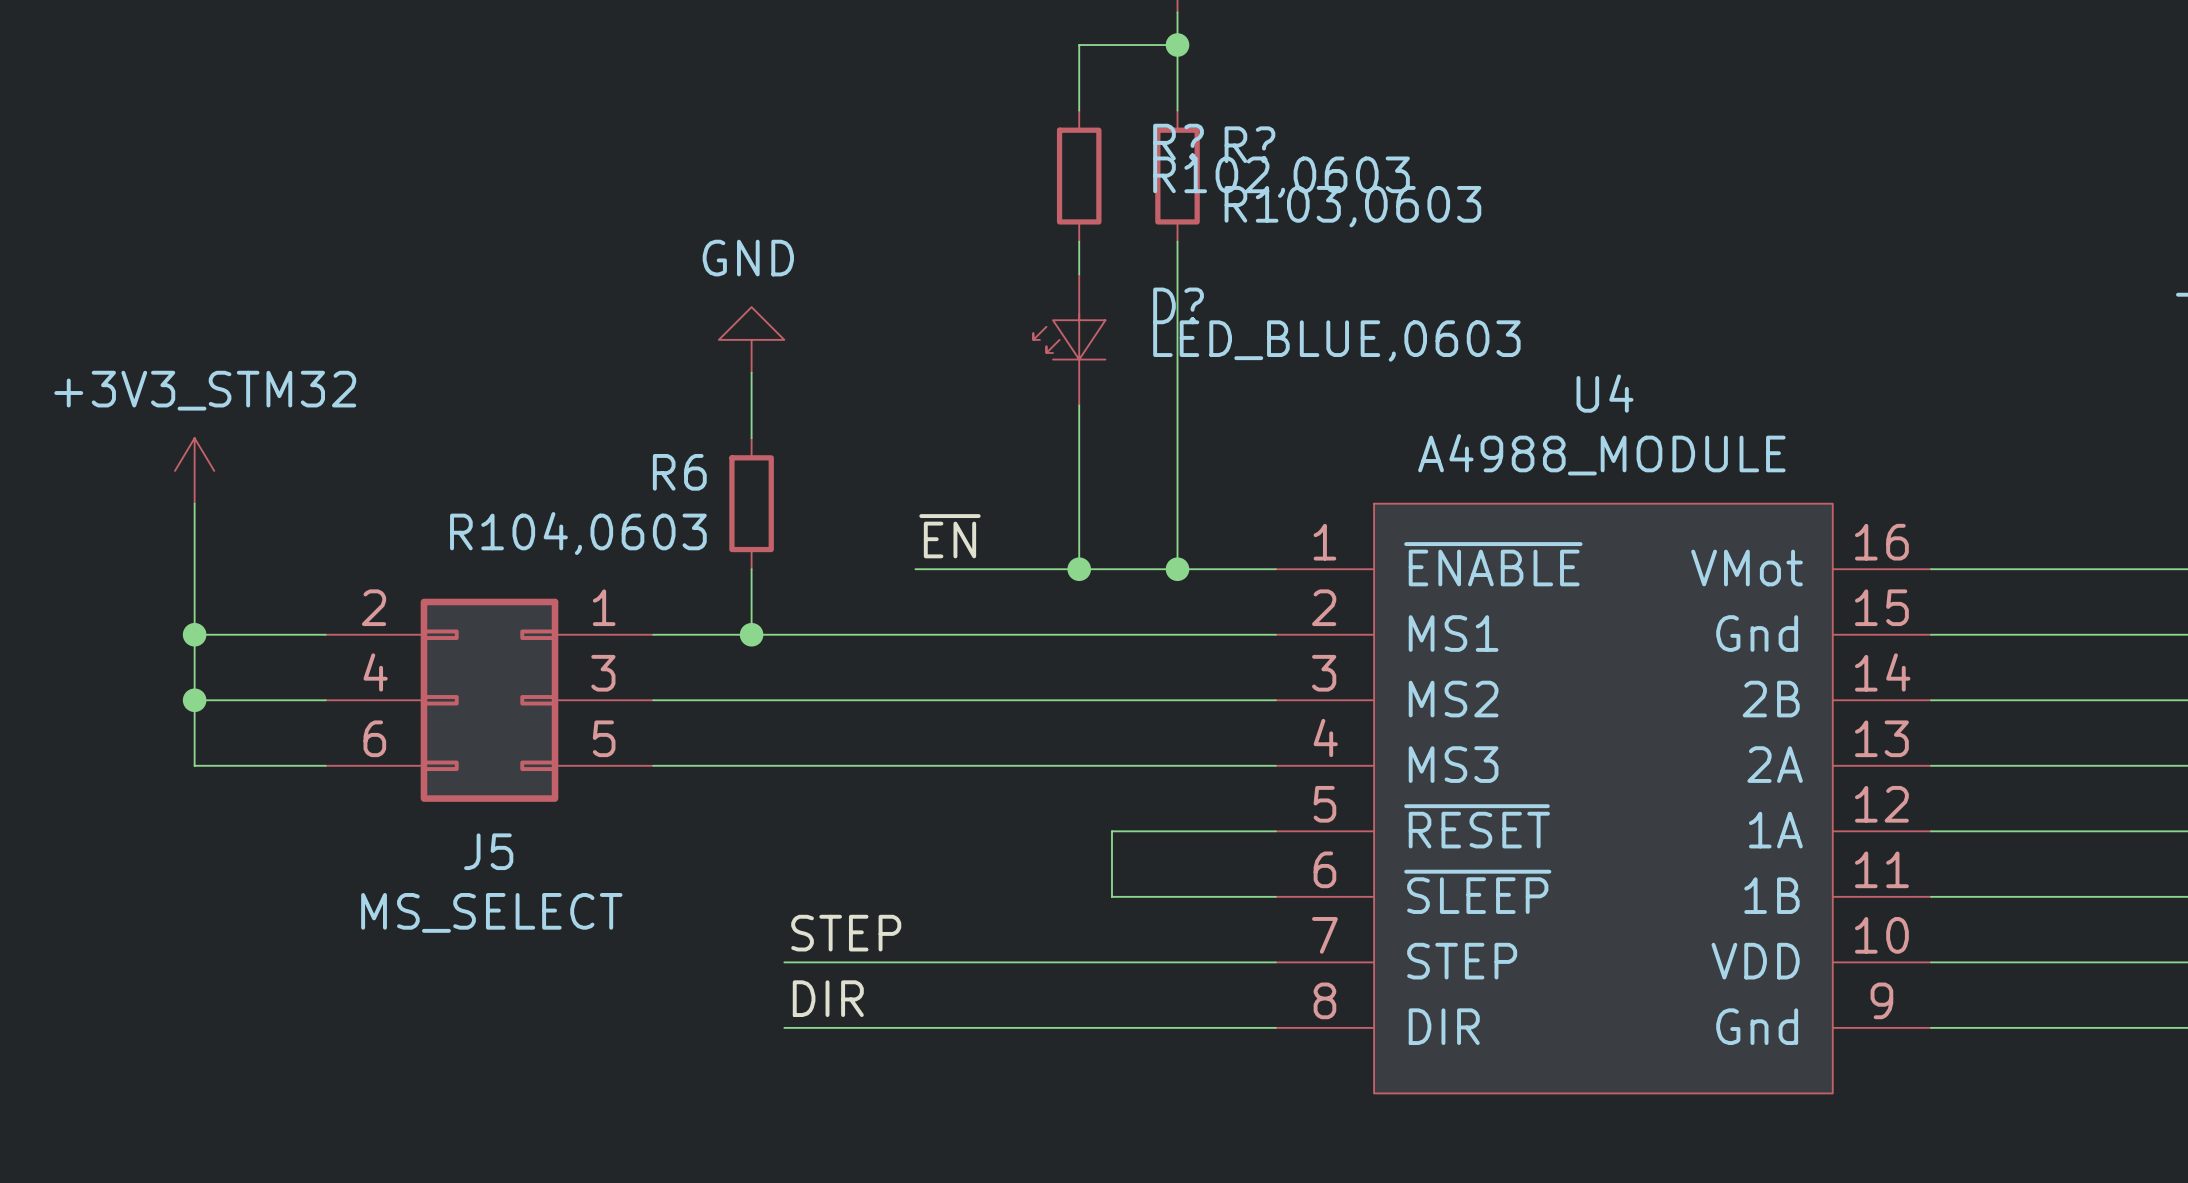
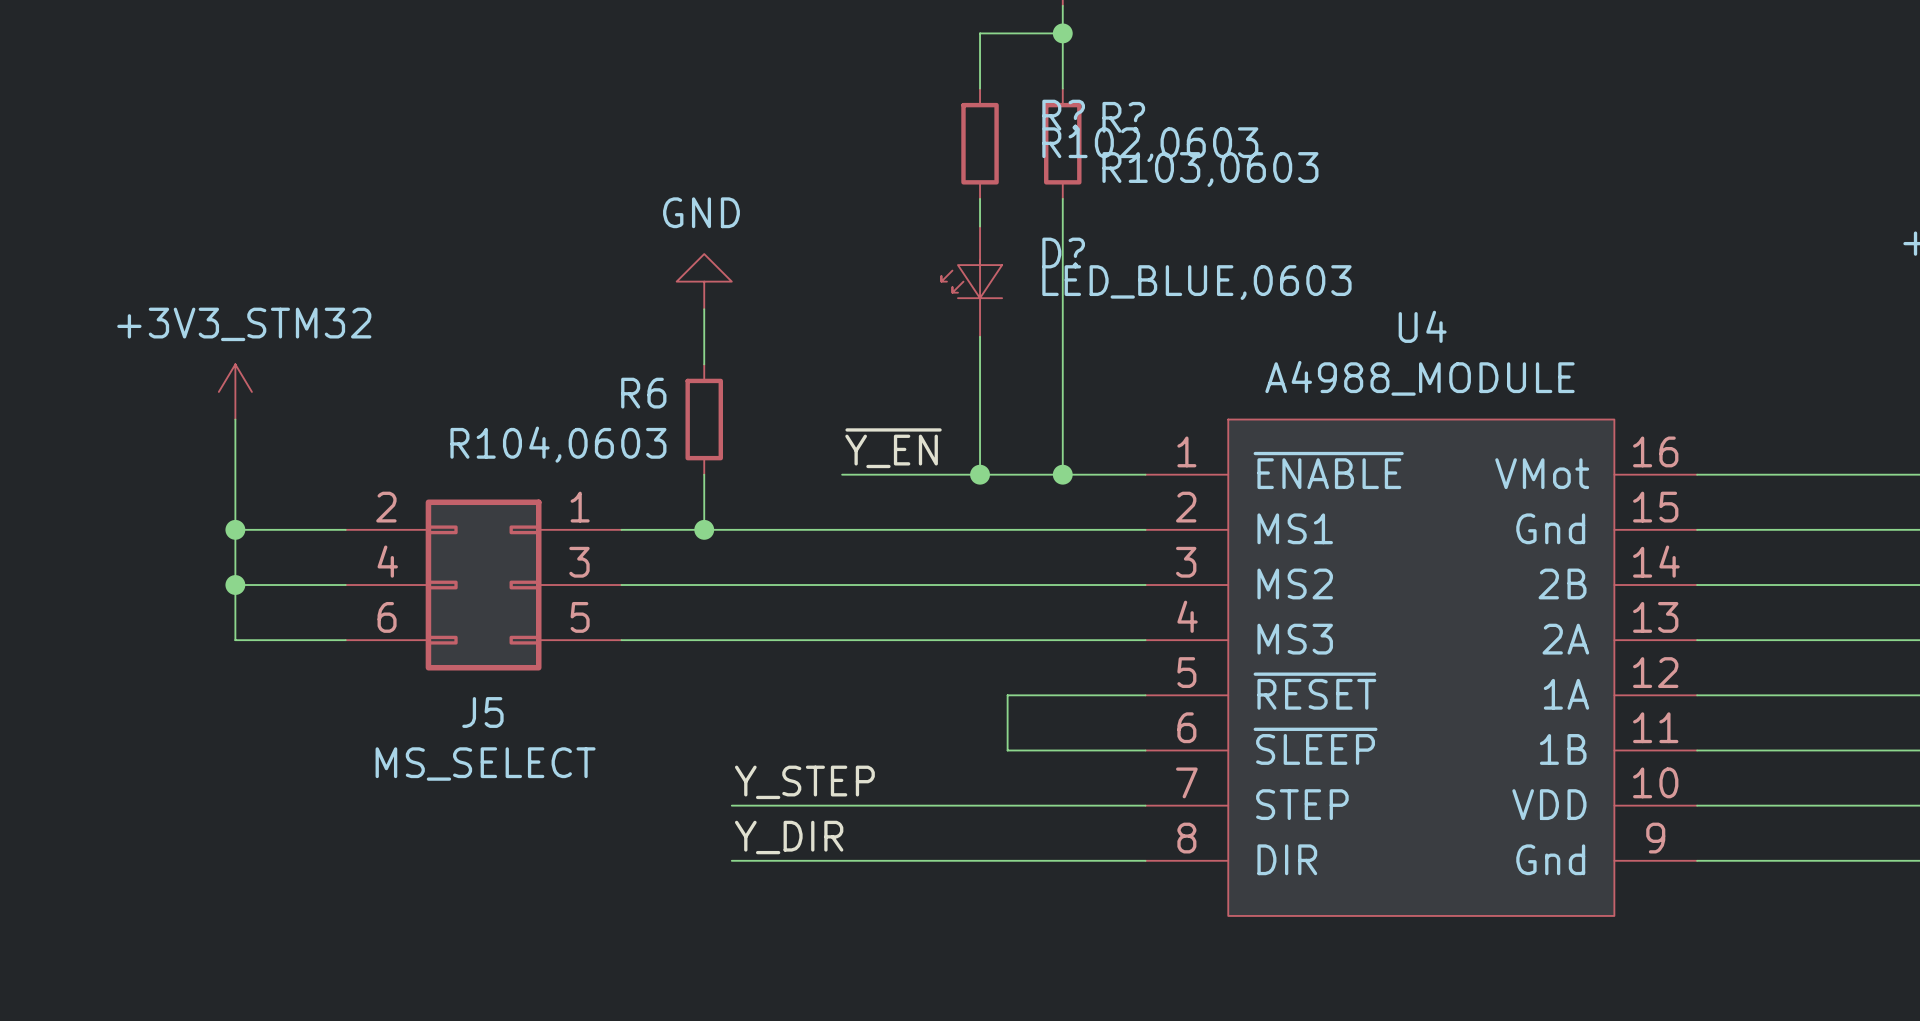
label: ~{EN} (949, 536) -> ~{Y_EN} (893, 448)
label: STEP (846, 933) -> Y_STEP (804, 782)
label: DIR (828, 998) -> Y_DIR (789, 837)

